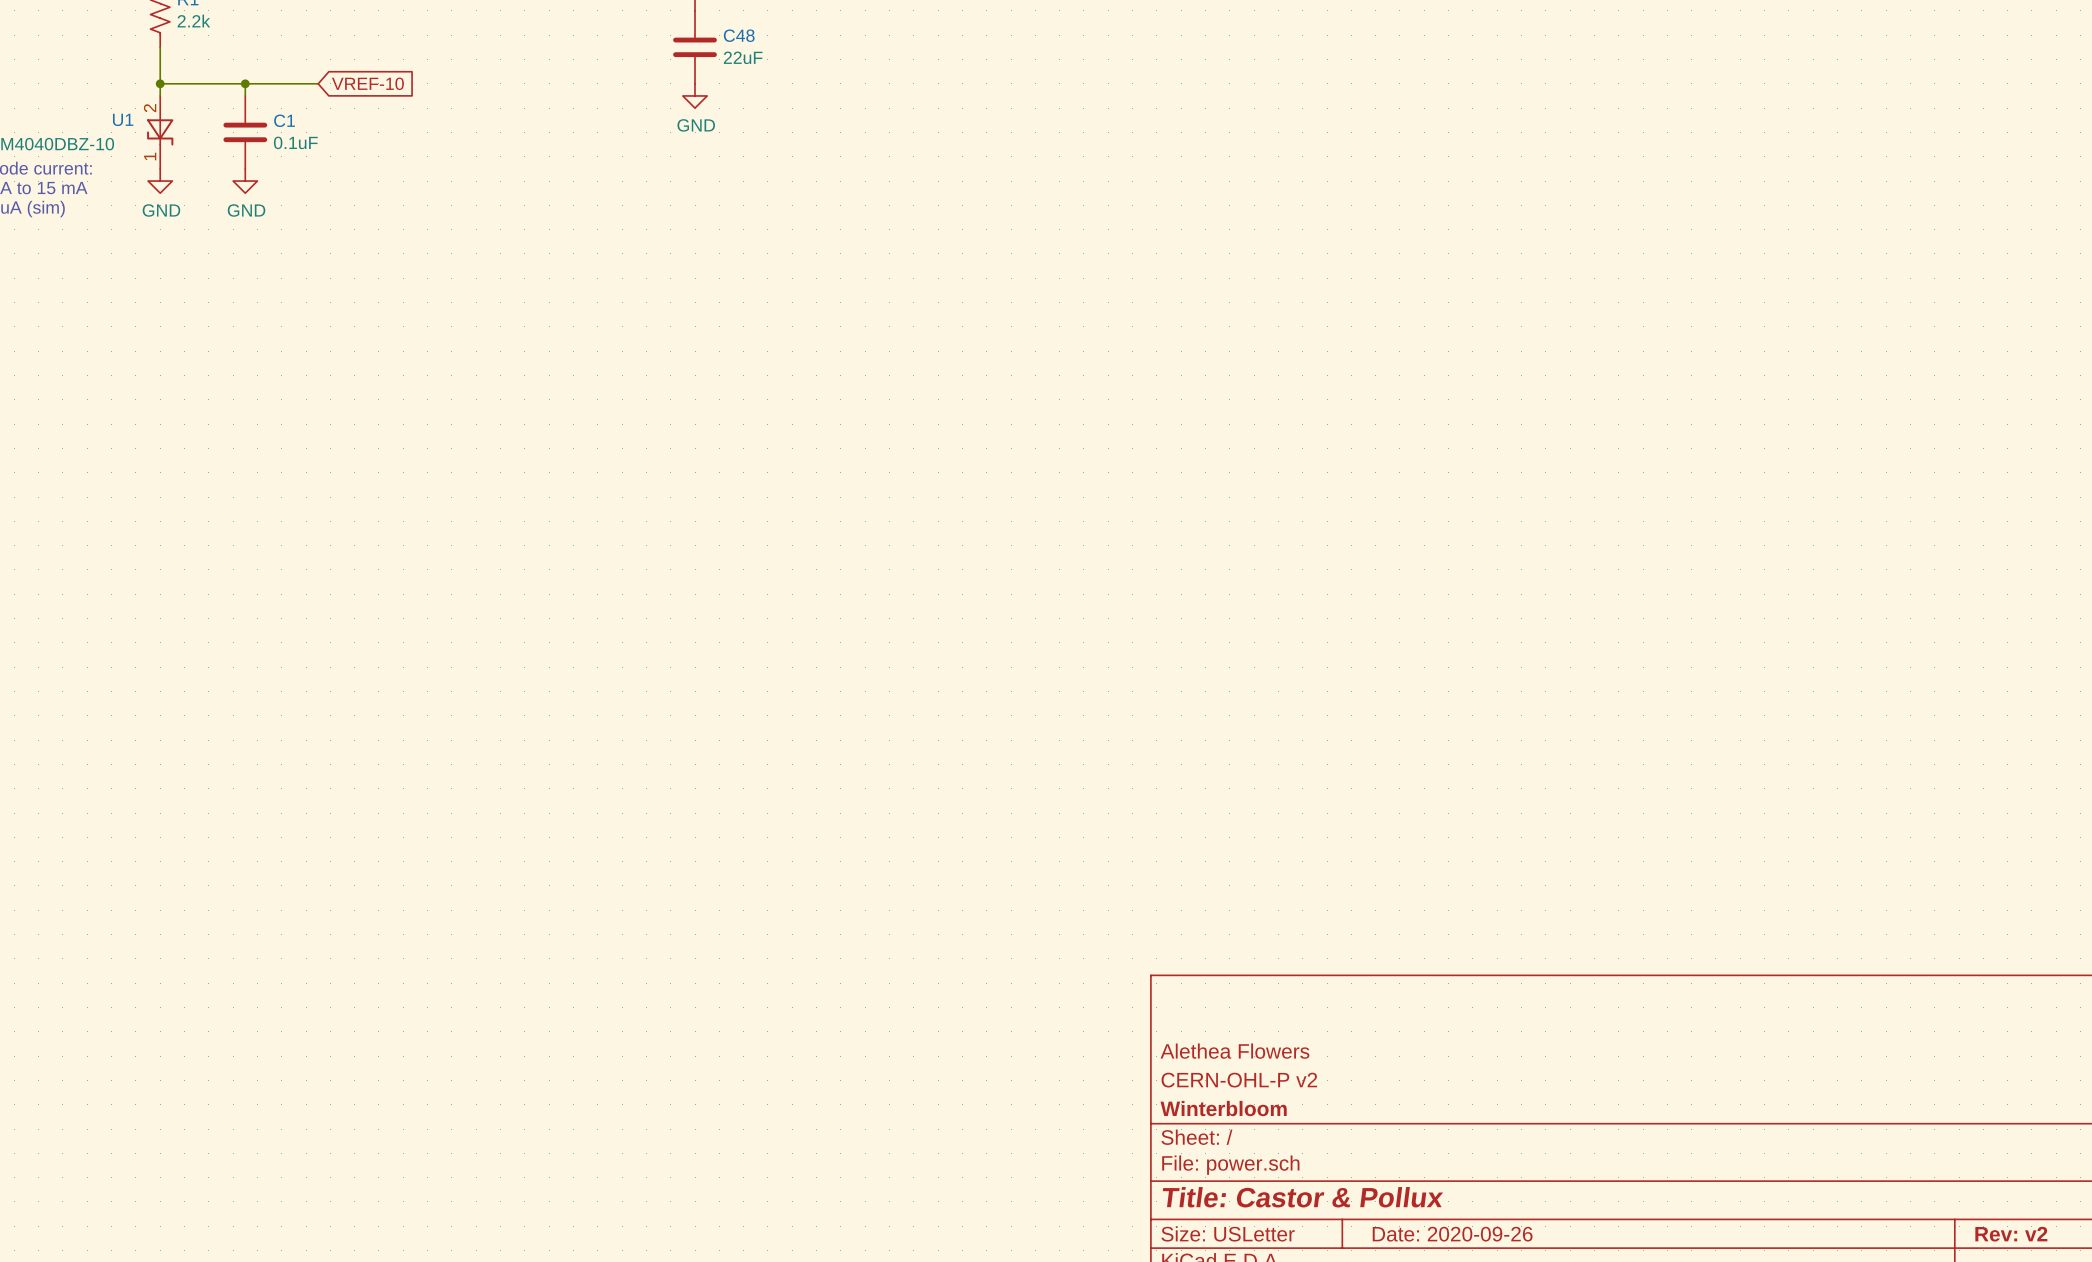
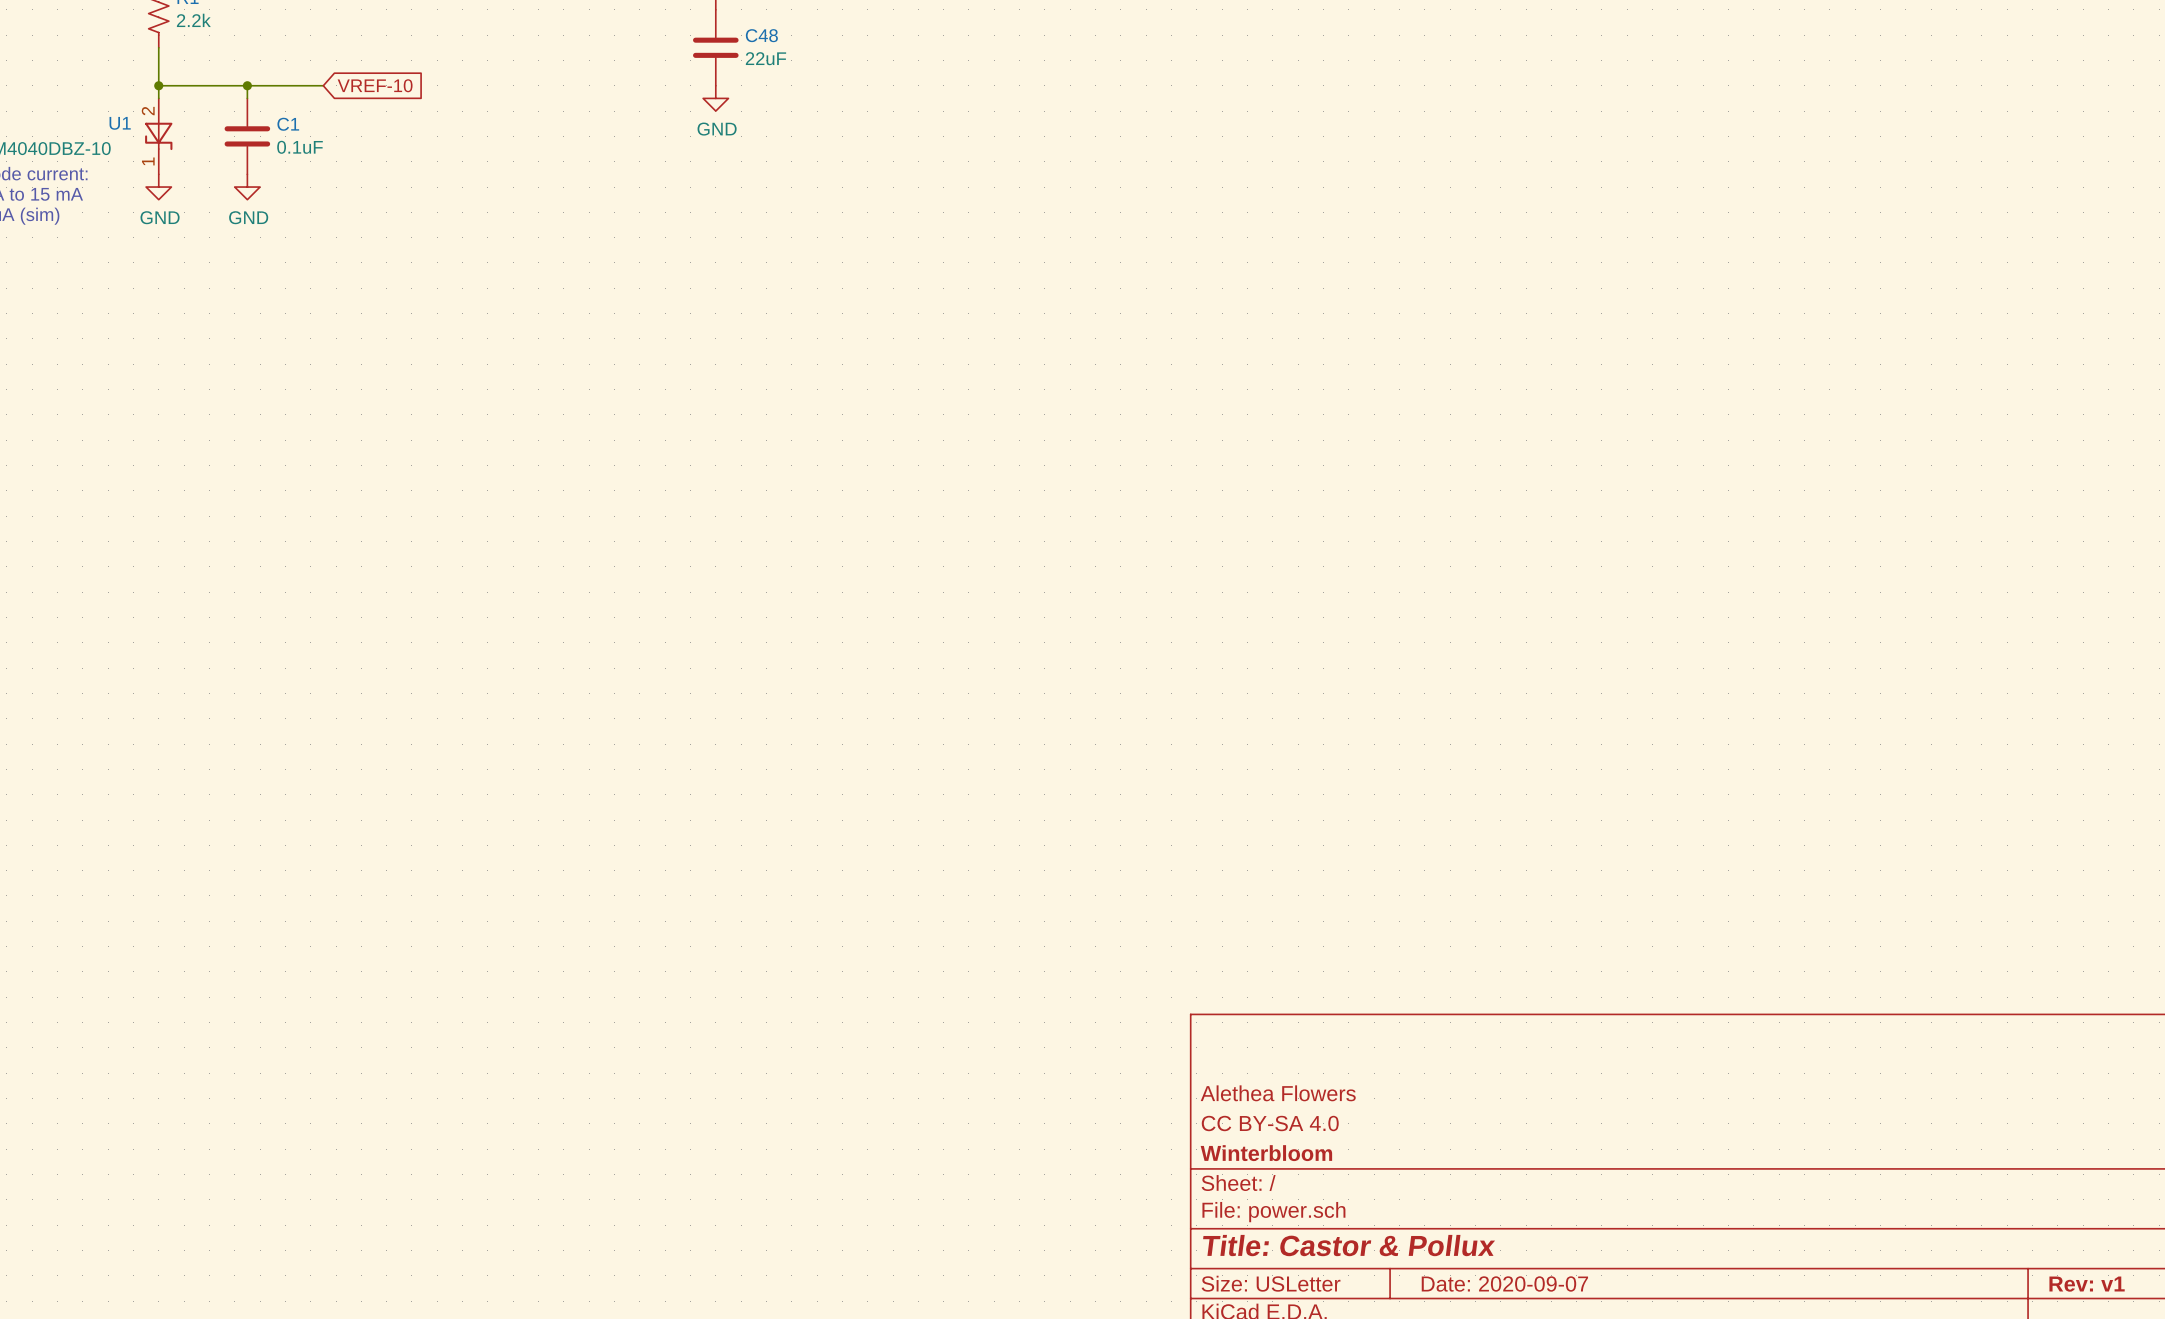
title block: CERN-OHL-P v2 (1239, 1080) -> CC BY-SA 4.0 (1270, 1123)
title block: Date: 2020-09-26 (1452, 1234) -> Date: 2020-09-07 (1504, 1284)
title block: Rev: v2 (2011, 1234) -> Rev: v1 (2087, 1284)

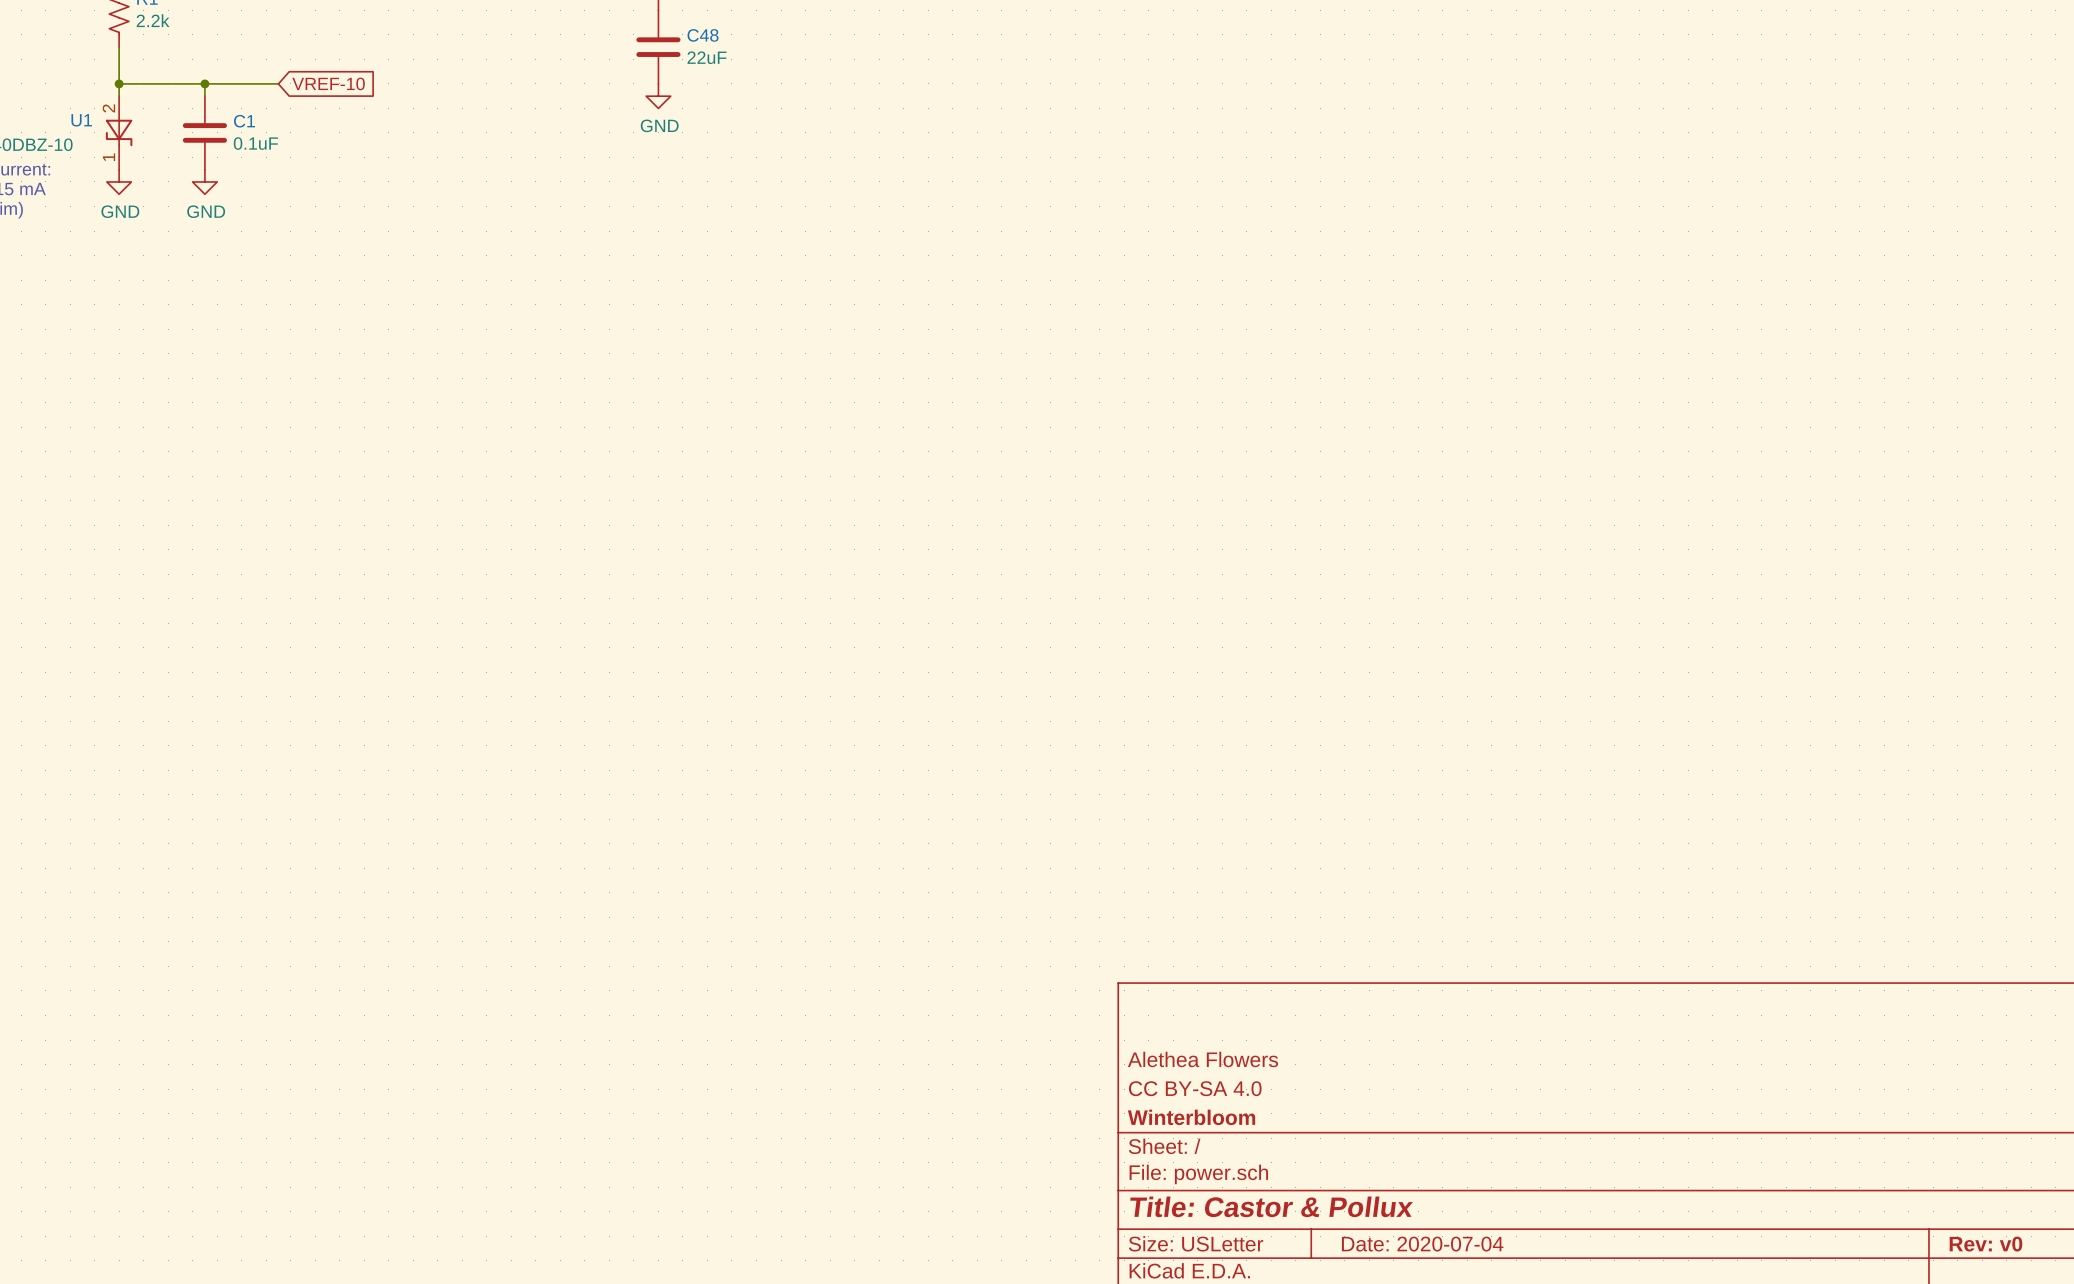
title block: Date: 2020-09-07 (1504, 1284) -> Date: 2020-07-04 (1422, 1244)
title block: Rev: v1 (2087, 1284) -> Rev: v0 (1985, 1244)

